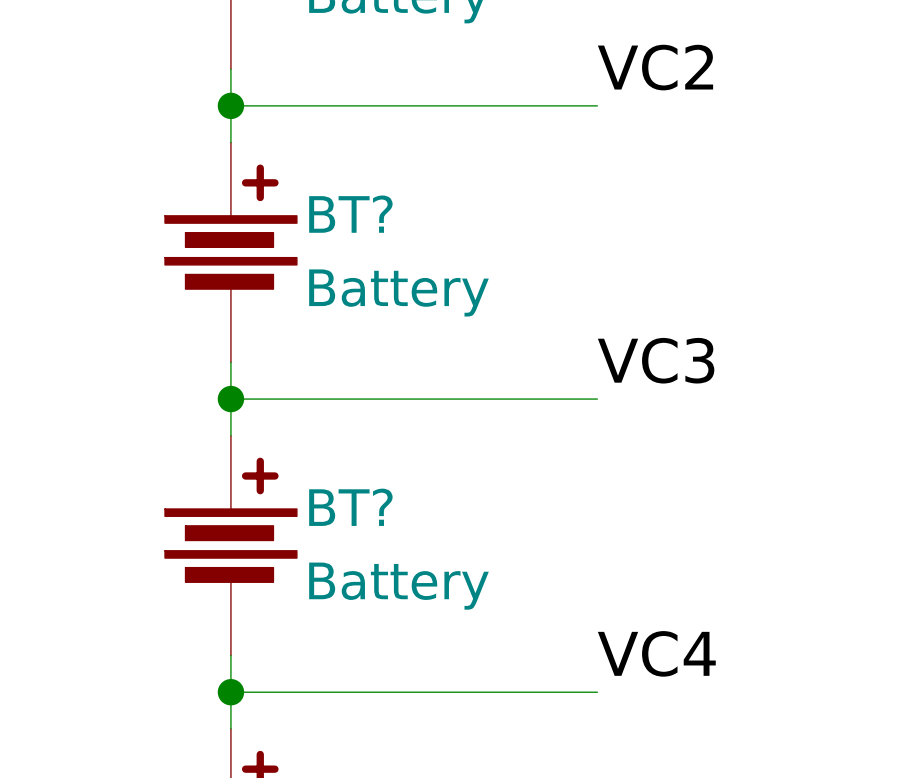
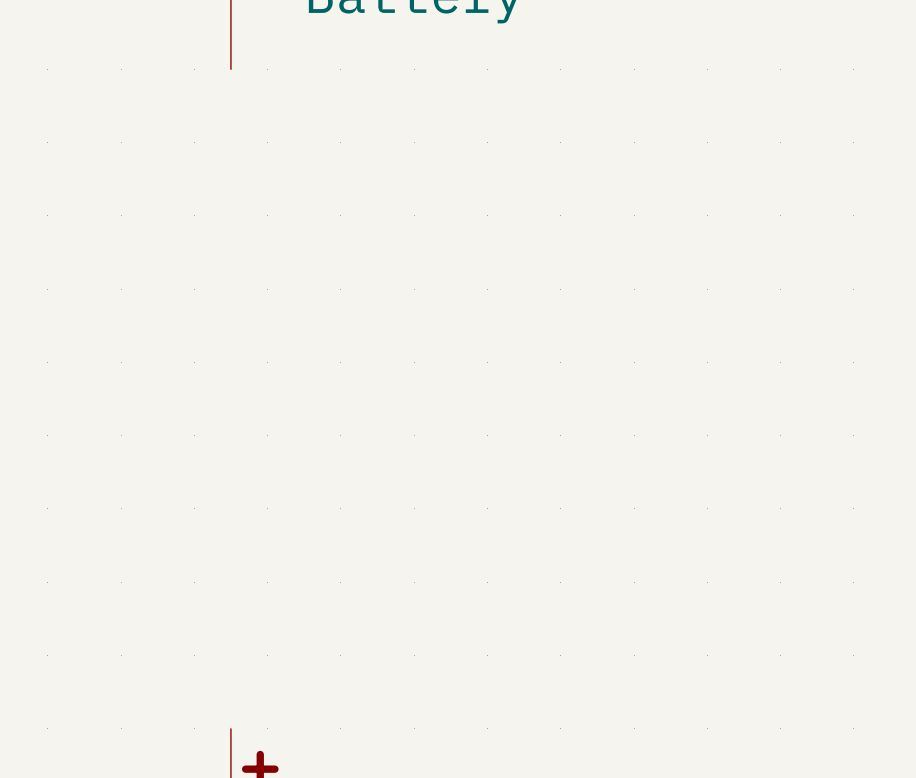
label: VC2 (655, 67) -> none
wire: (230, 69) (230, 142) -> none
wire: (230, 105) (597, 105) -> none
junction: (230, 105) -> none
BT?: Battery (230, 252) -> none
label: VC3 (656, 360) -> none
wire: (230, 362) (230, 435) -> none
wire: (230, 399) (597, 399) -> none
junction: (230, 399) -> none
BT?: Battery (230, 545) -> none
label: VC4 (656, 653) -> none
wire: (230, 655) (230, 728) -> none
wire: (230, 692) (597, 692) -> none
junction: (230, 692) -> none

